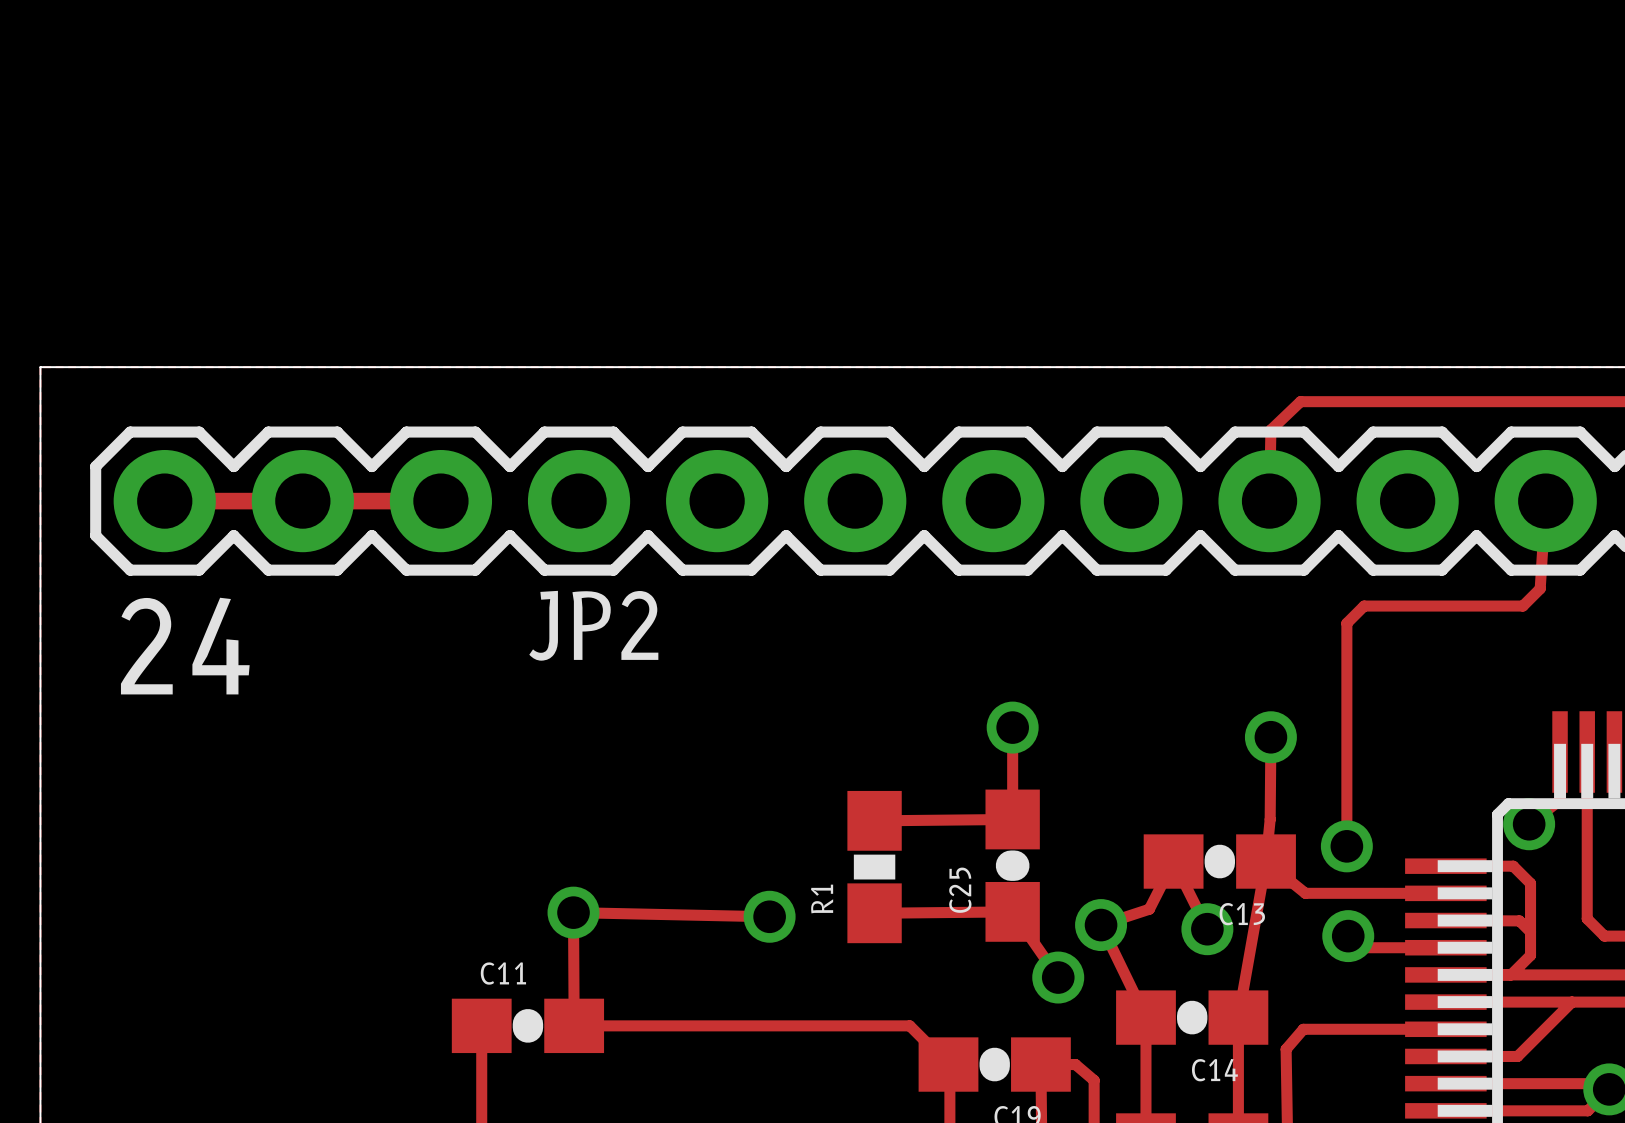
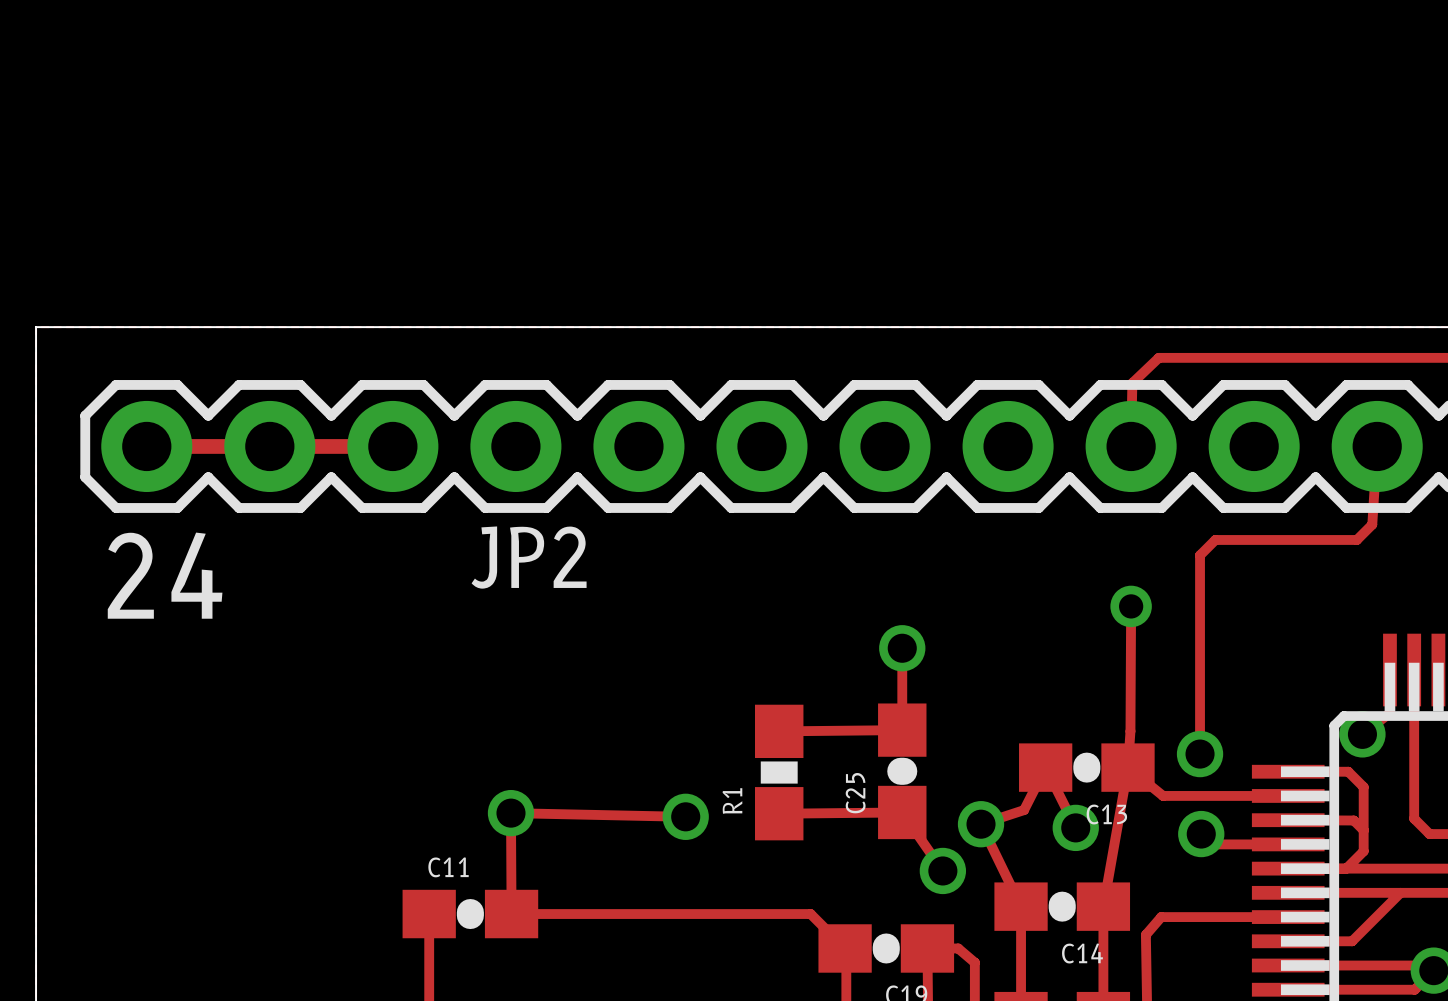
via: none -> (1131, 606)
track: (1270, 737) (1270, 819) (1266, 861) -> (1131, 606) (1130, 731) (1128, 767)
via: (1270, 737) -> none

